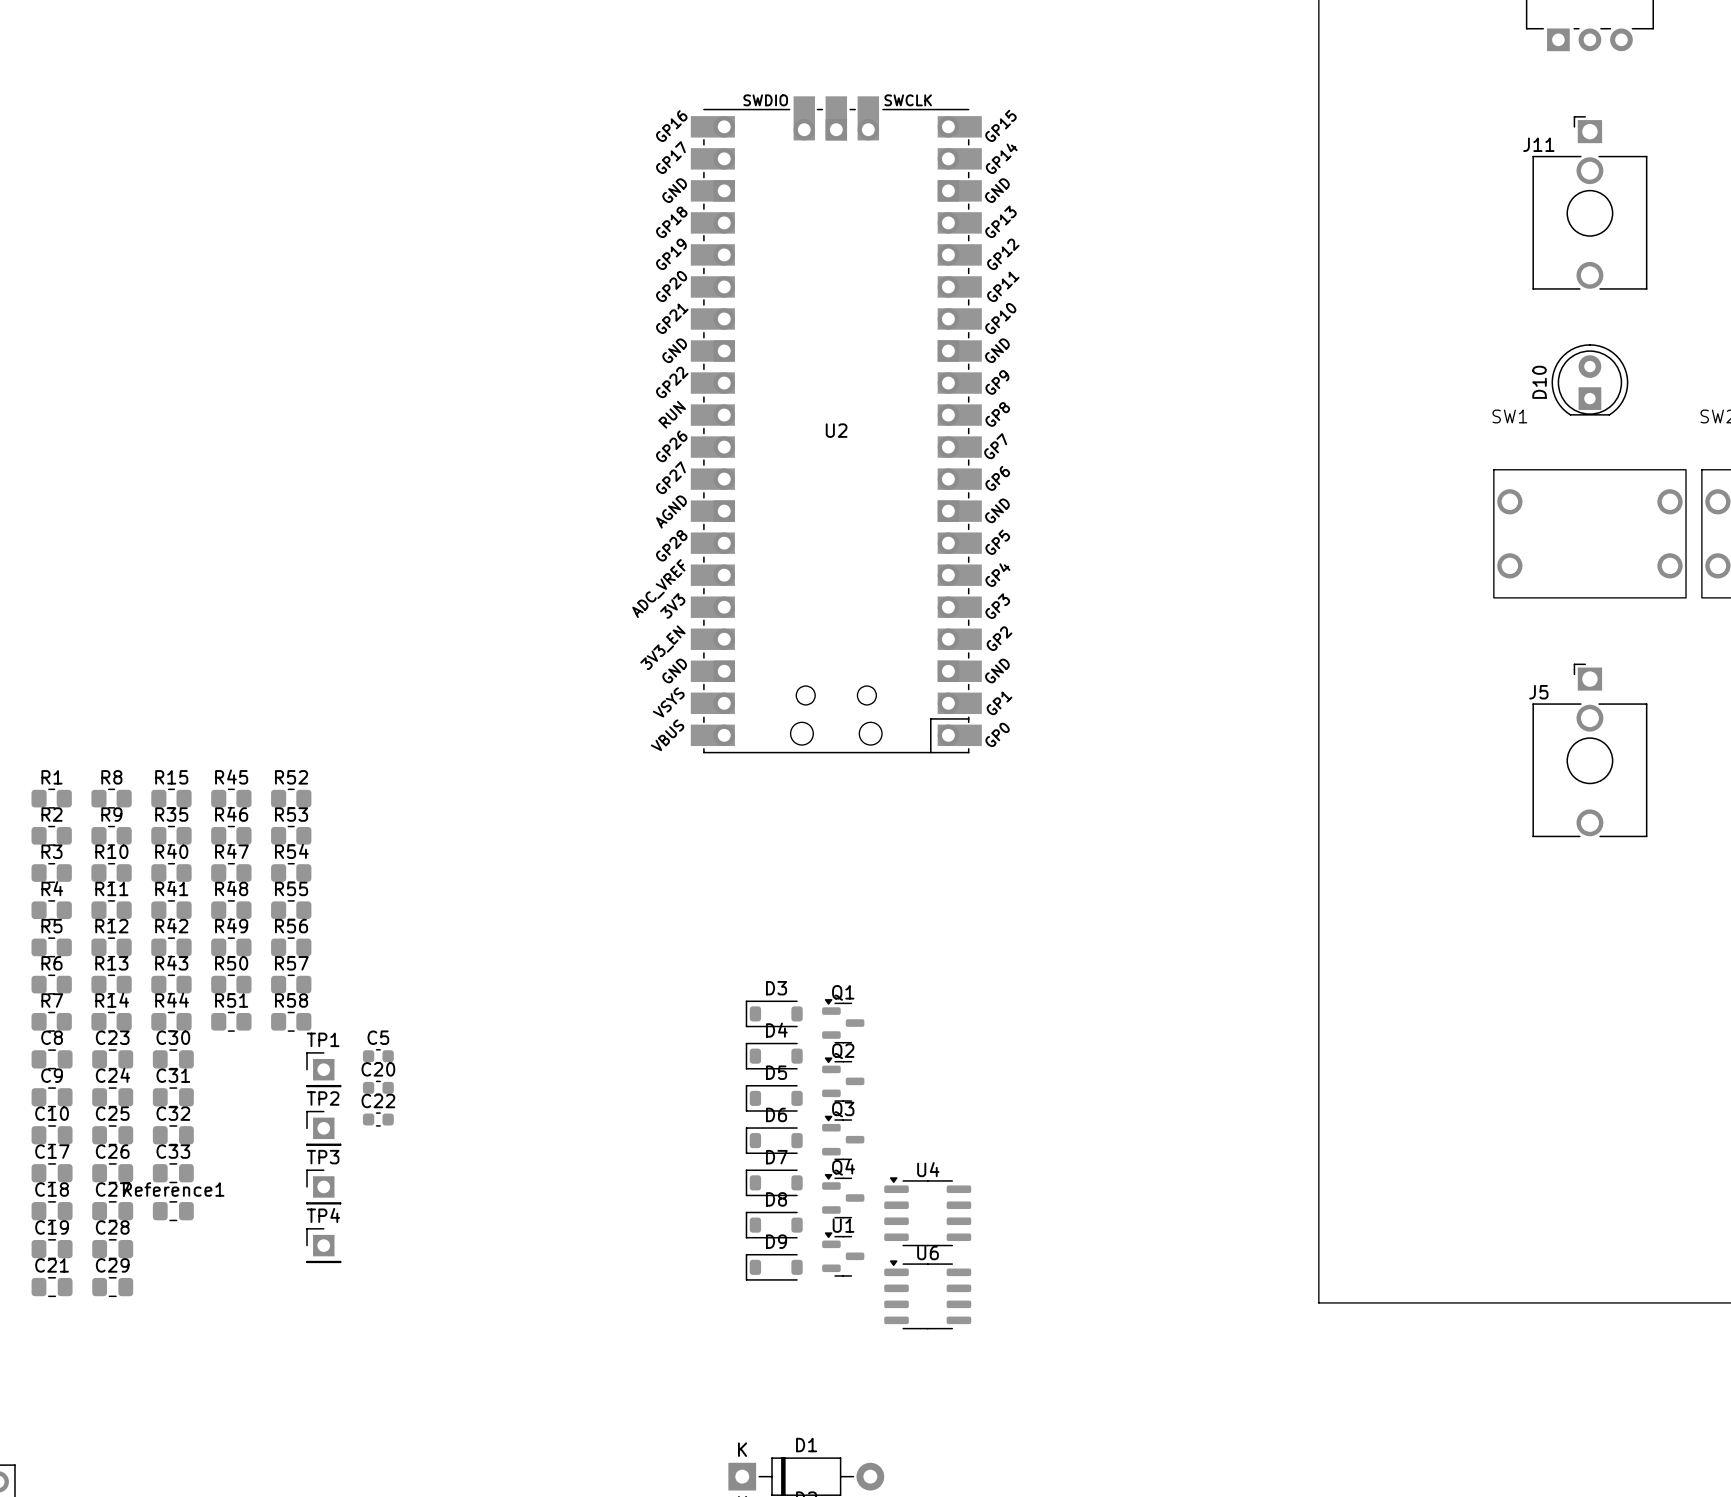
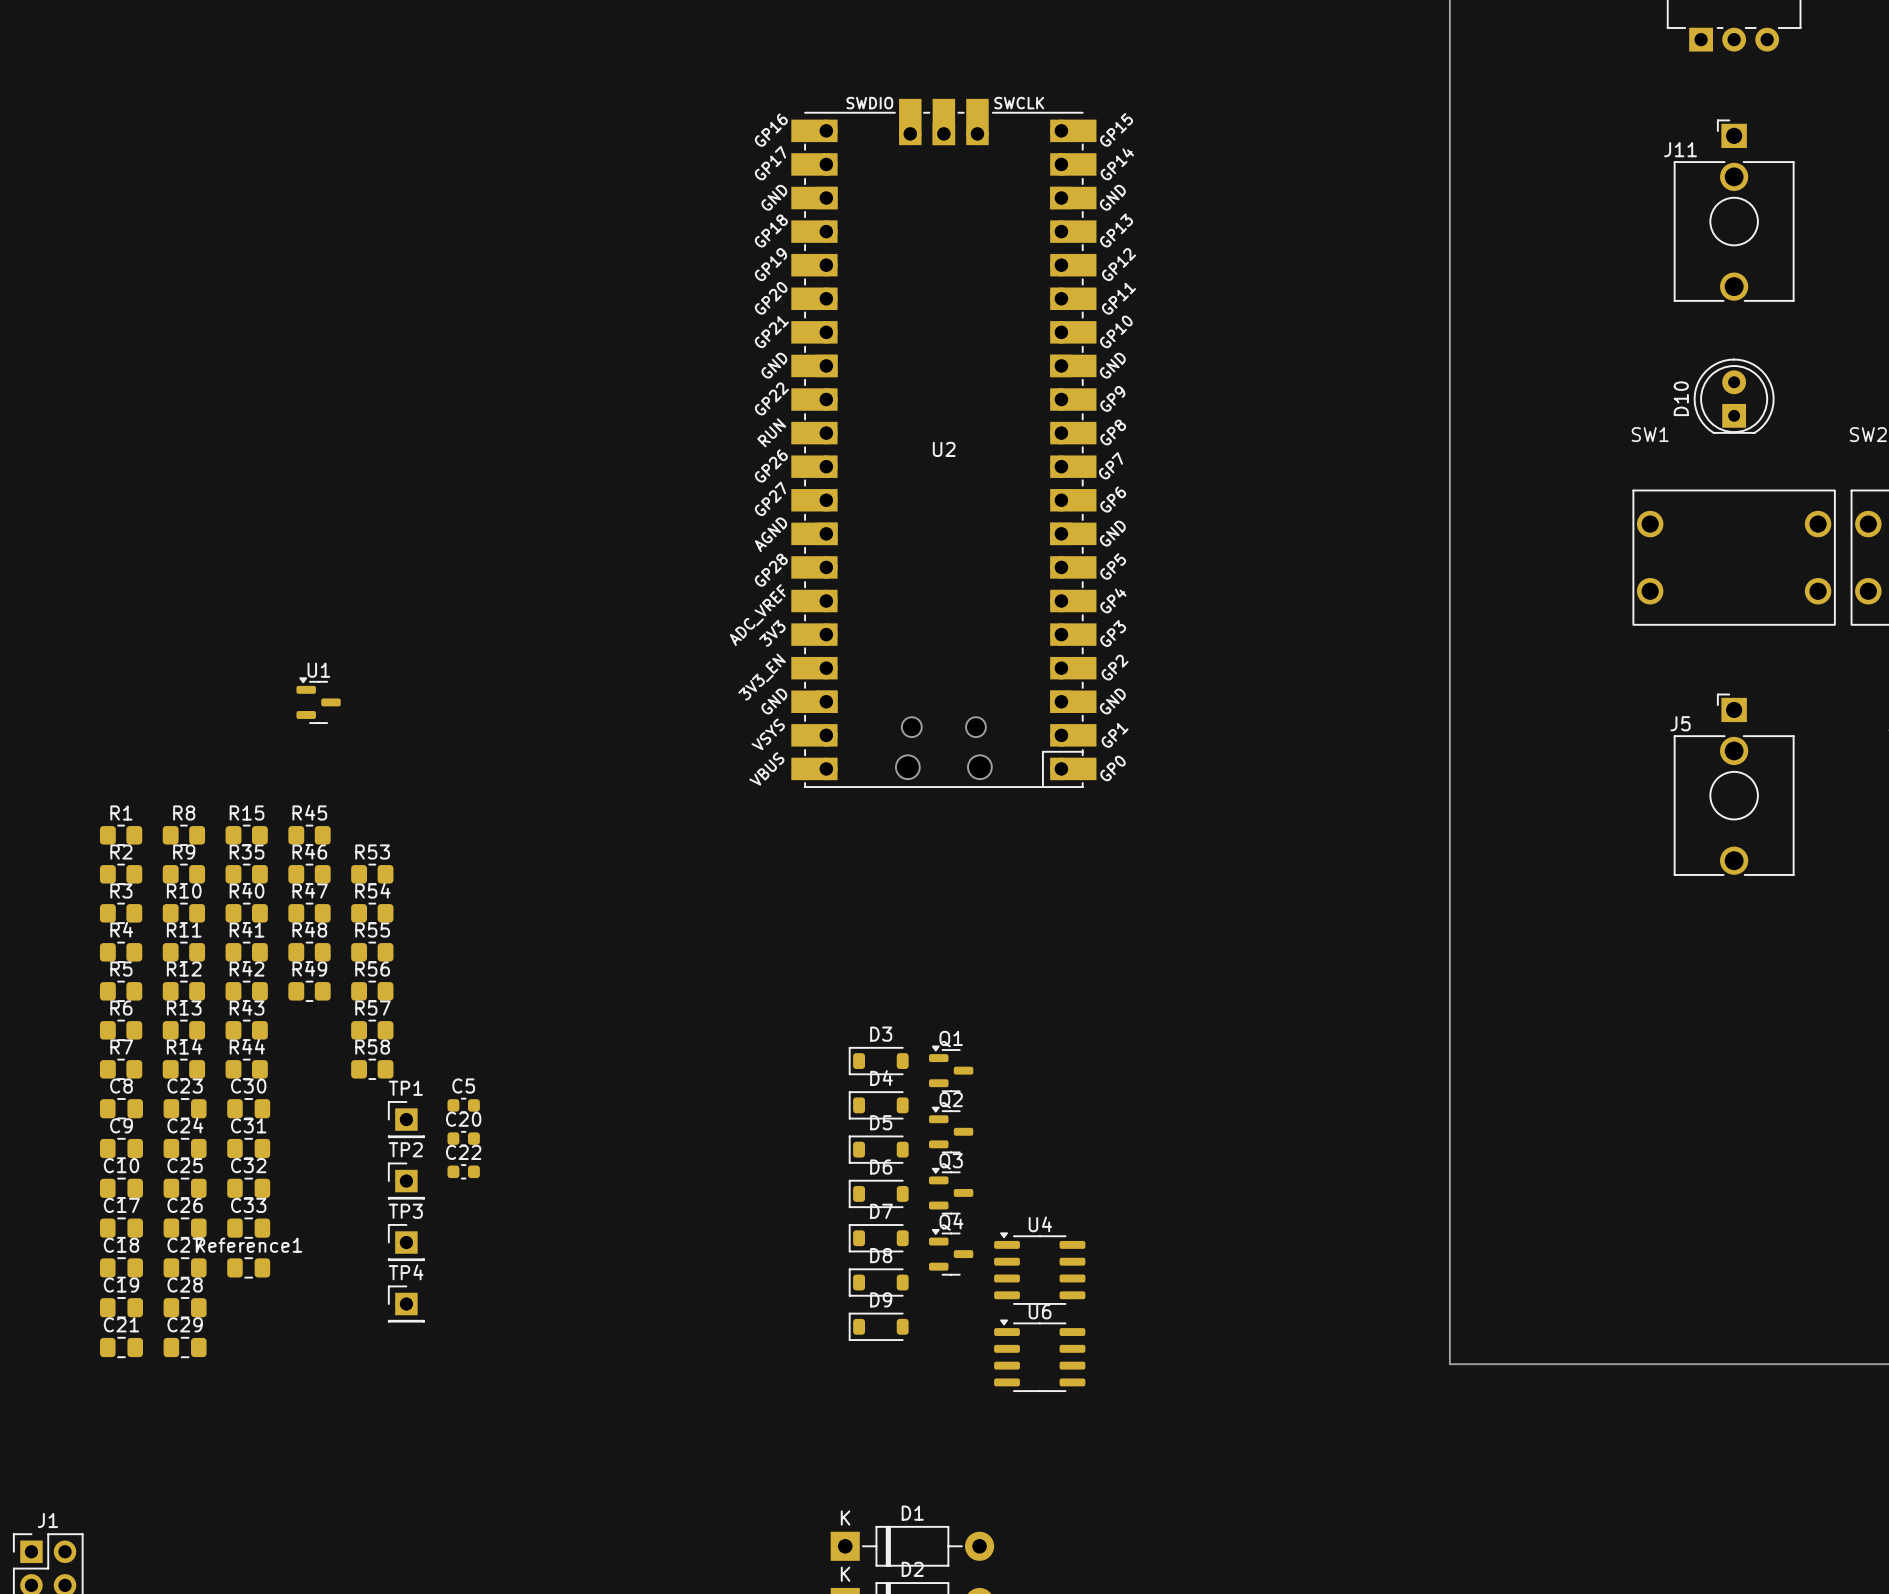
R52: (291, 798) -> none
R50: (231, 984) -> none
R51: (231, 1021) -> none
U1 position: (843, 1254) -> (318, 700)

